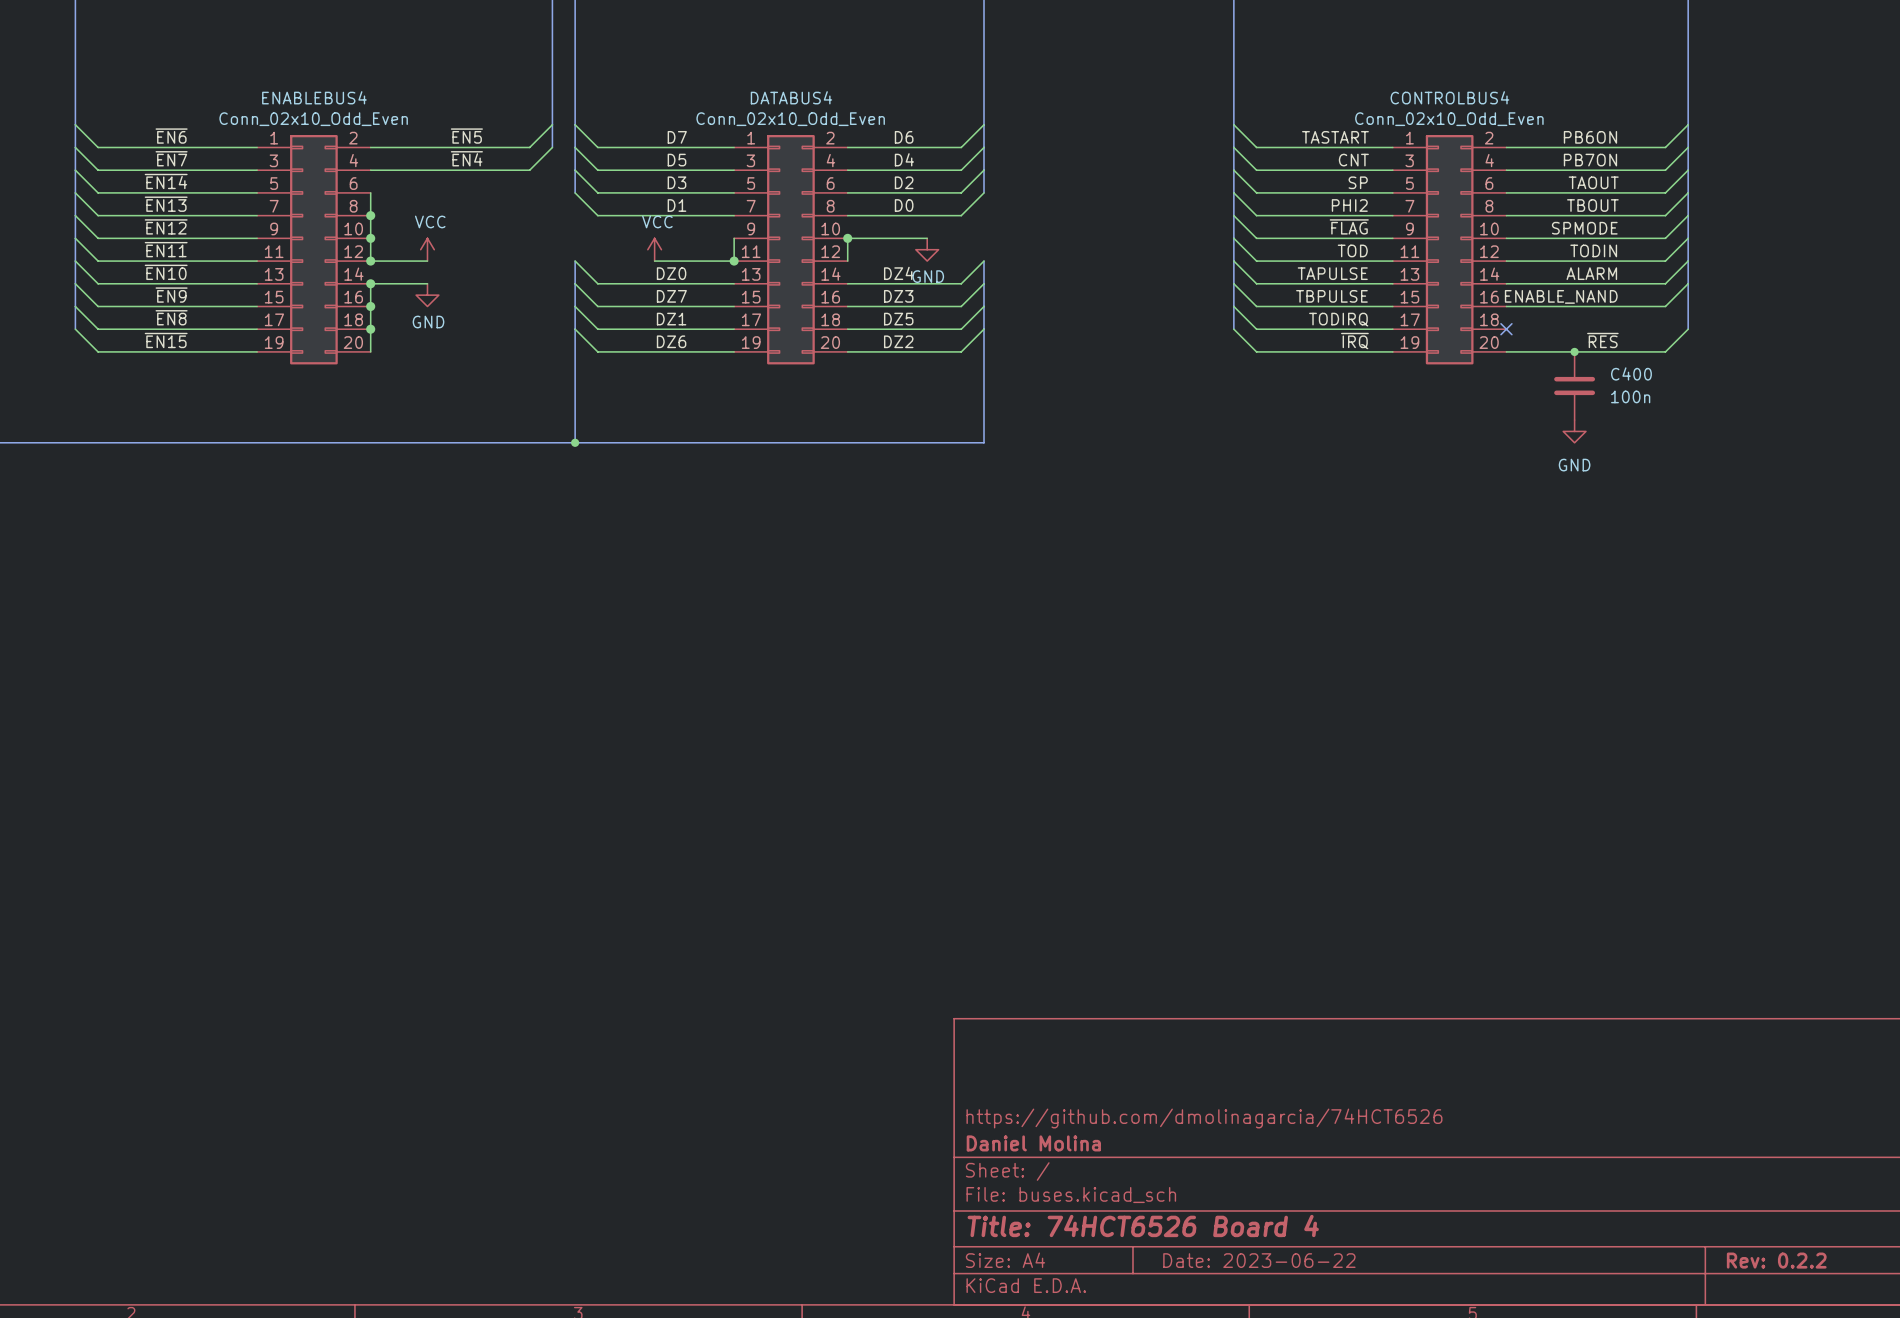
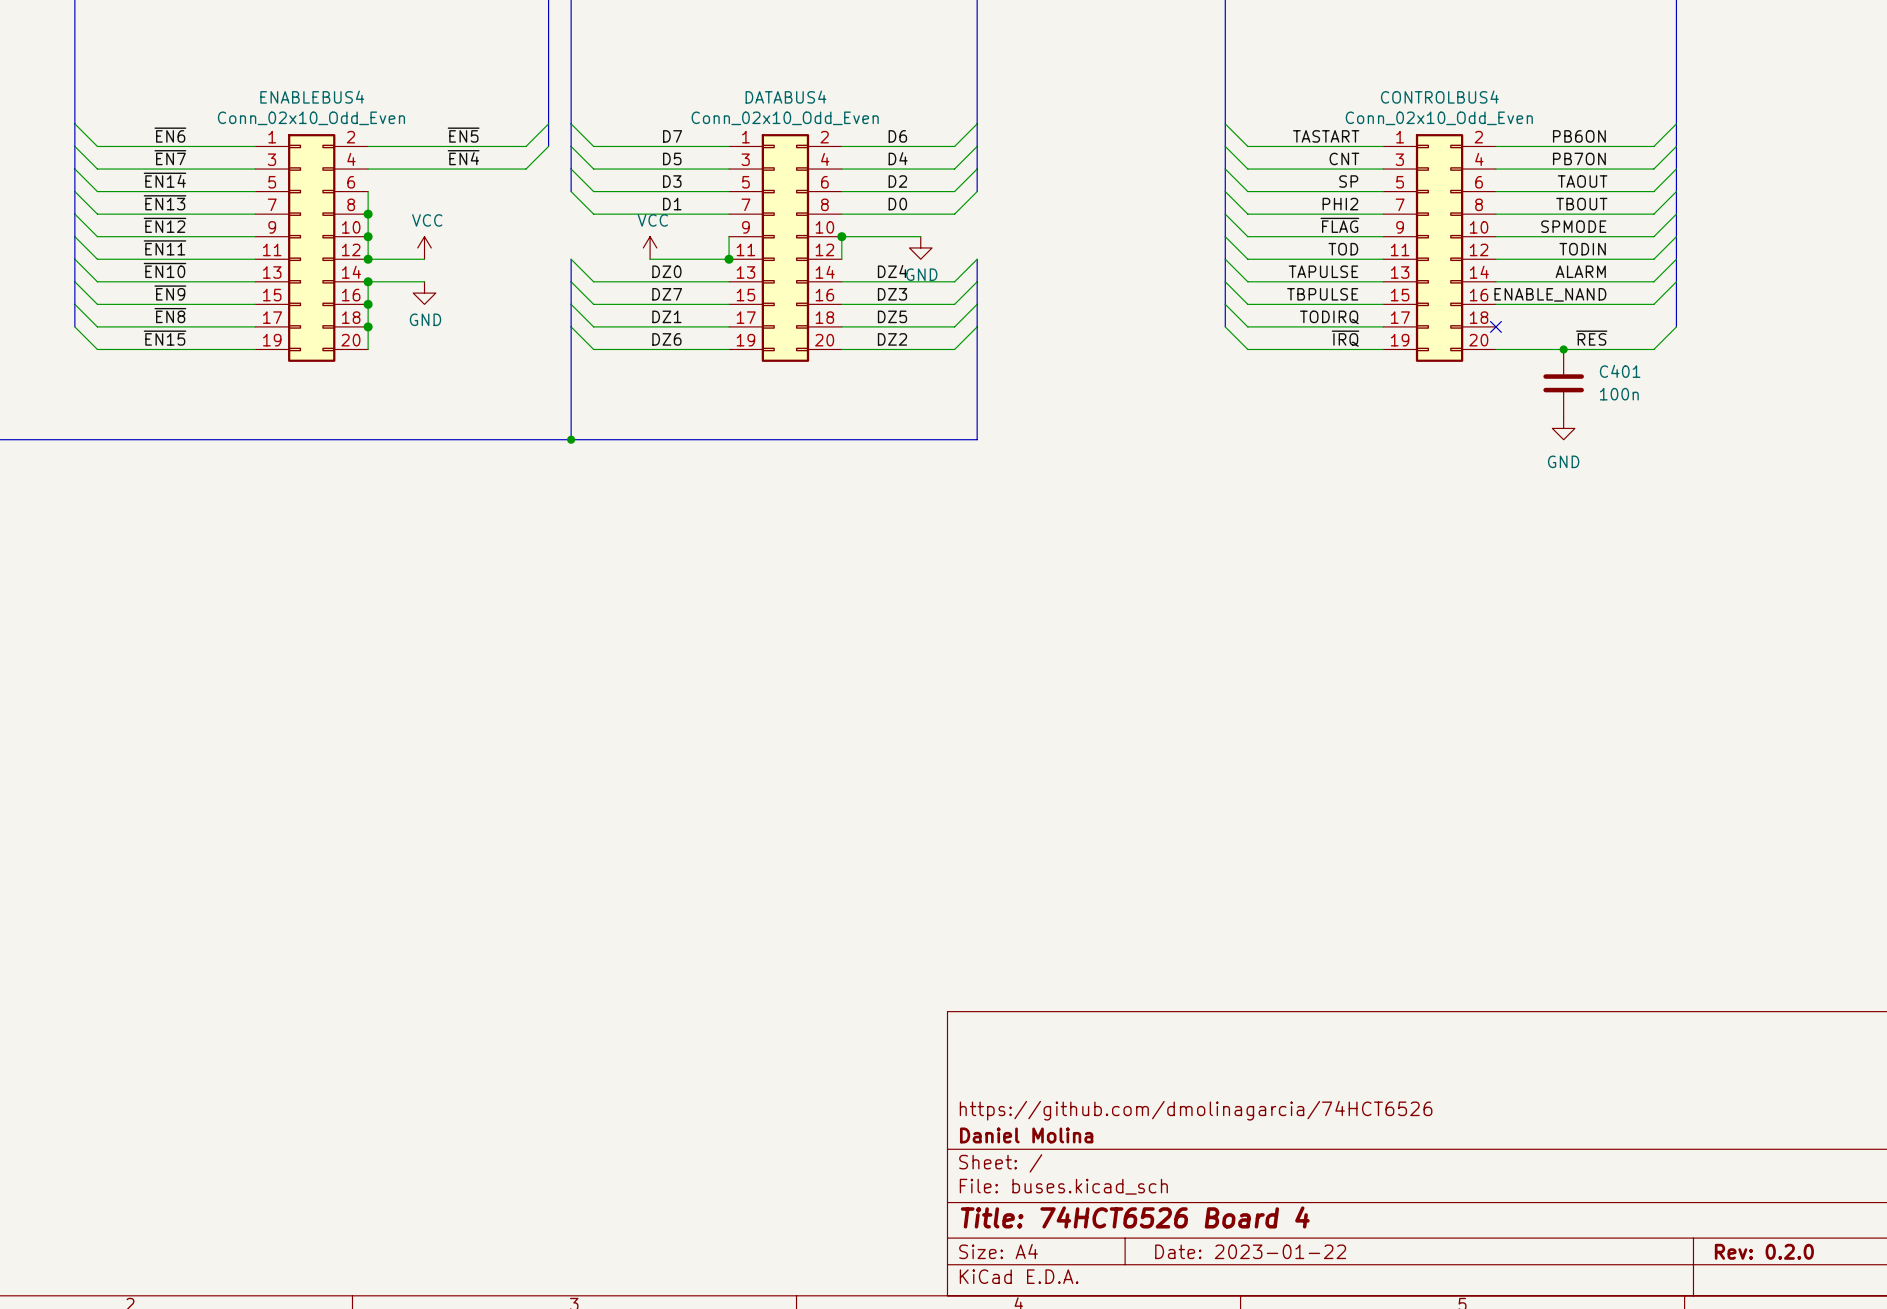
C400 name: C400 (1631, 373) -> C401 (1620, 371)
title block: Date: 2023-06-22 (1259, 1260) -> Date: 2023-01-22 (1250, 1251)
title block: Rev: 0.2.2 (1776, 1260) -> Rev: 0.2.0 (1764, 1251)

